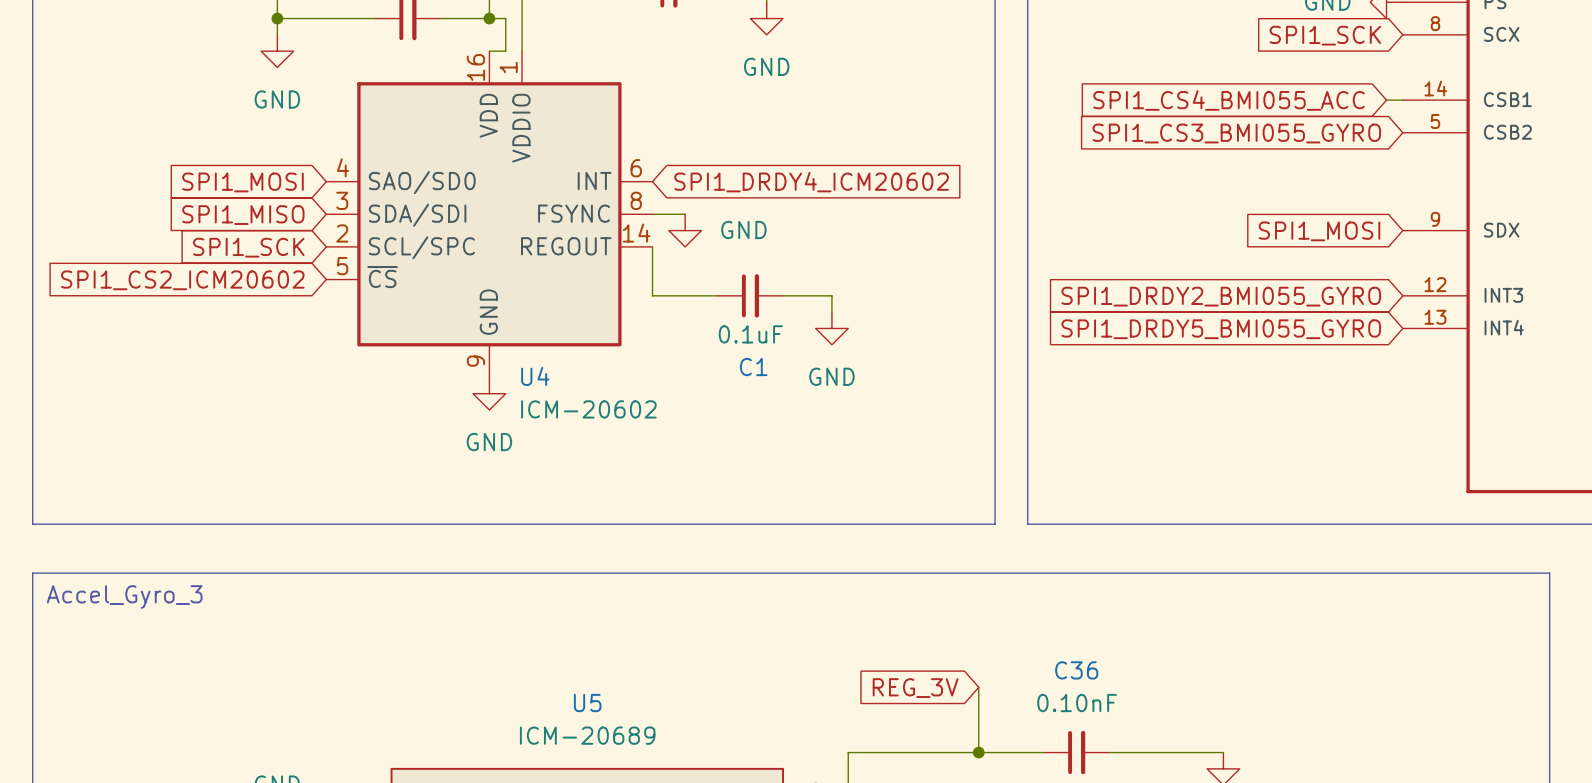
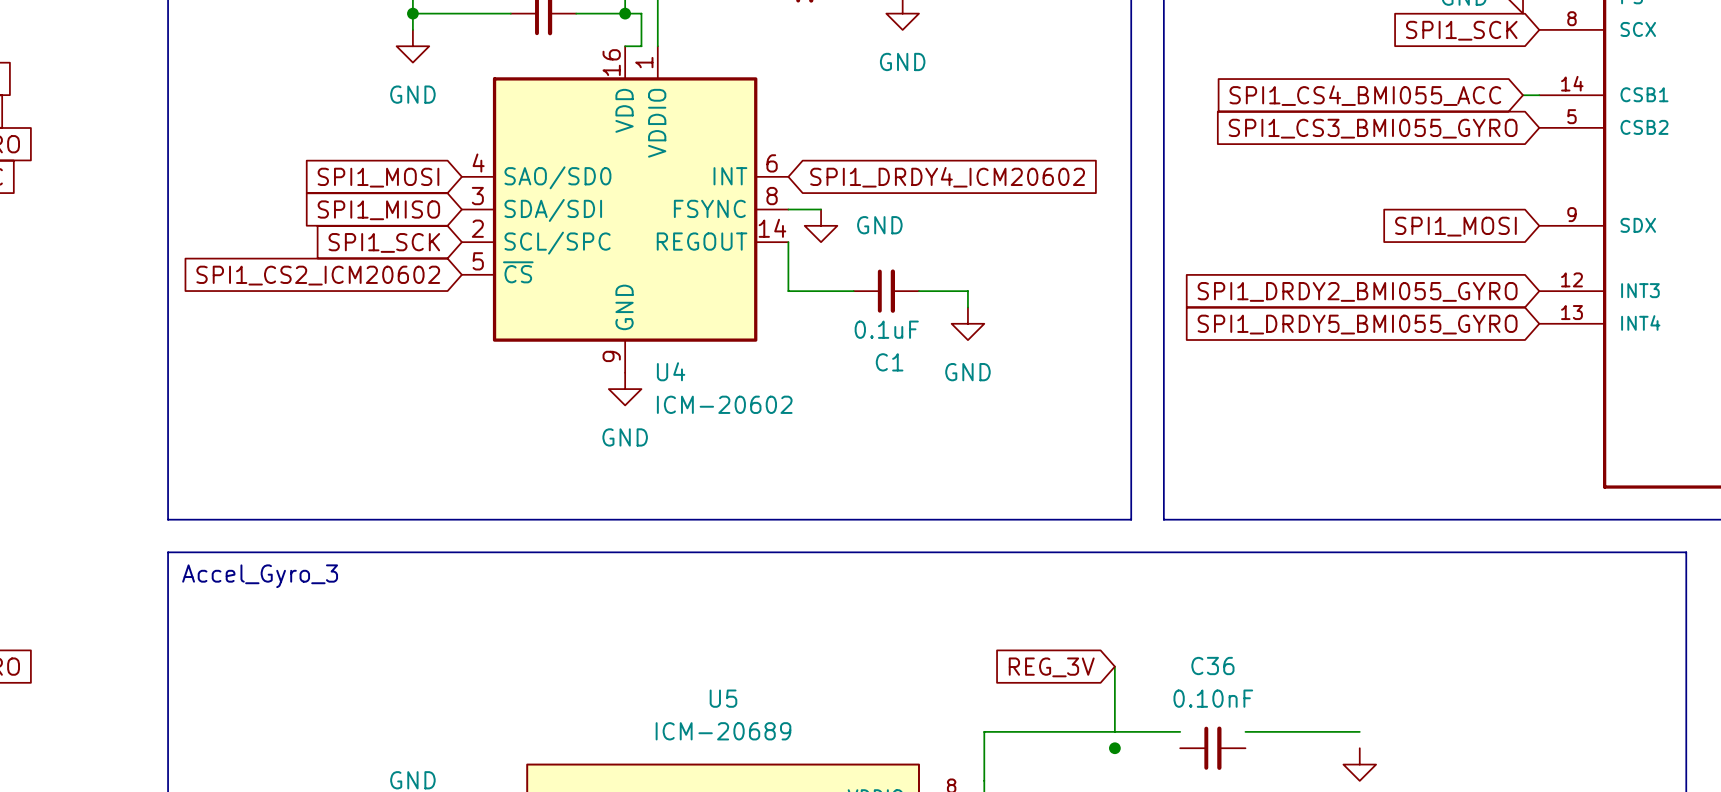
line: (32, 573) (1549, 573) -> (168, 568) (168, 552) (1686, 552) (1686, 568)
text position: Accel_Gyro_3 (124, 597) -> Accel_Gyro_3 (260, 576)
global label position: REG_3V (915, 688) -> REG_3V (1051, 667)
wire: (978, 736) (978, 752) -> (1114, 666) (1114, 682)
wire: (848, 752) (1043, 752) -> (984, 748) (984, 731) (1180, 731)
wire: (1109, 752) (1223, 752) -> (1245, 731) (1359, 731)

